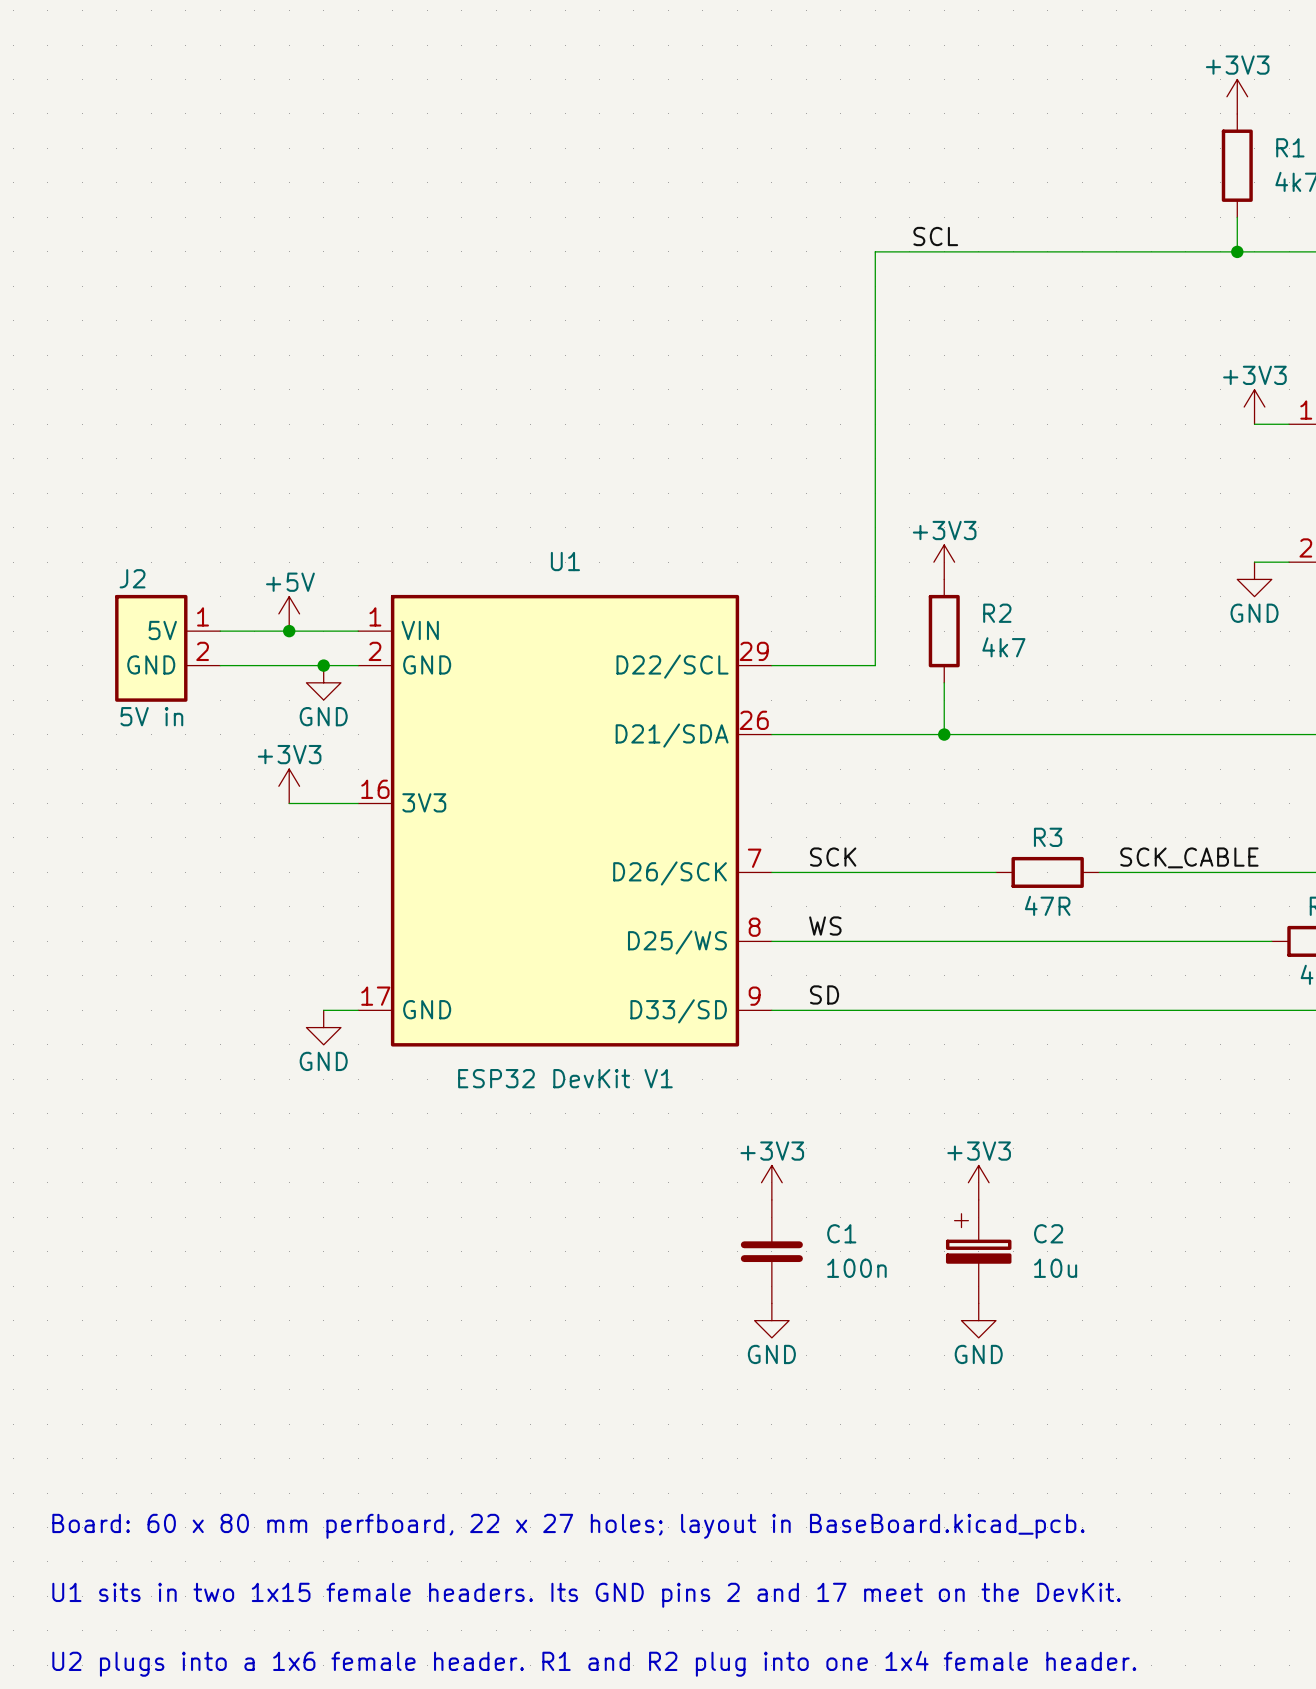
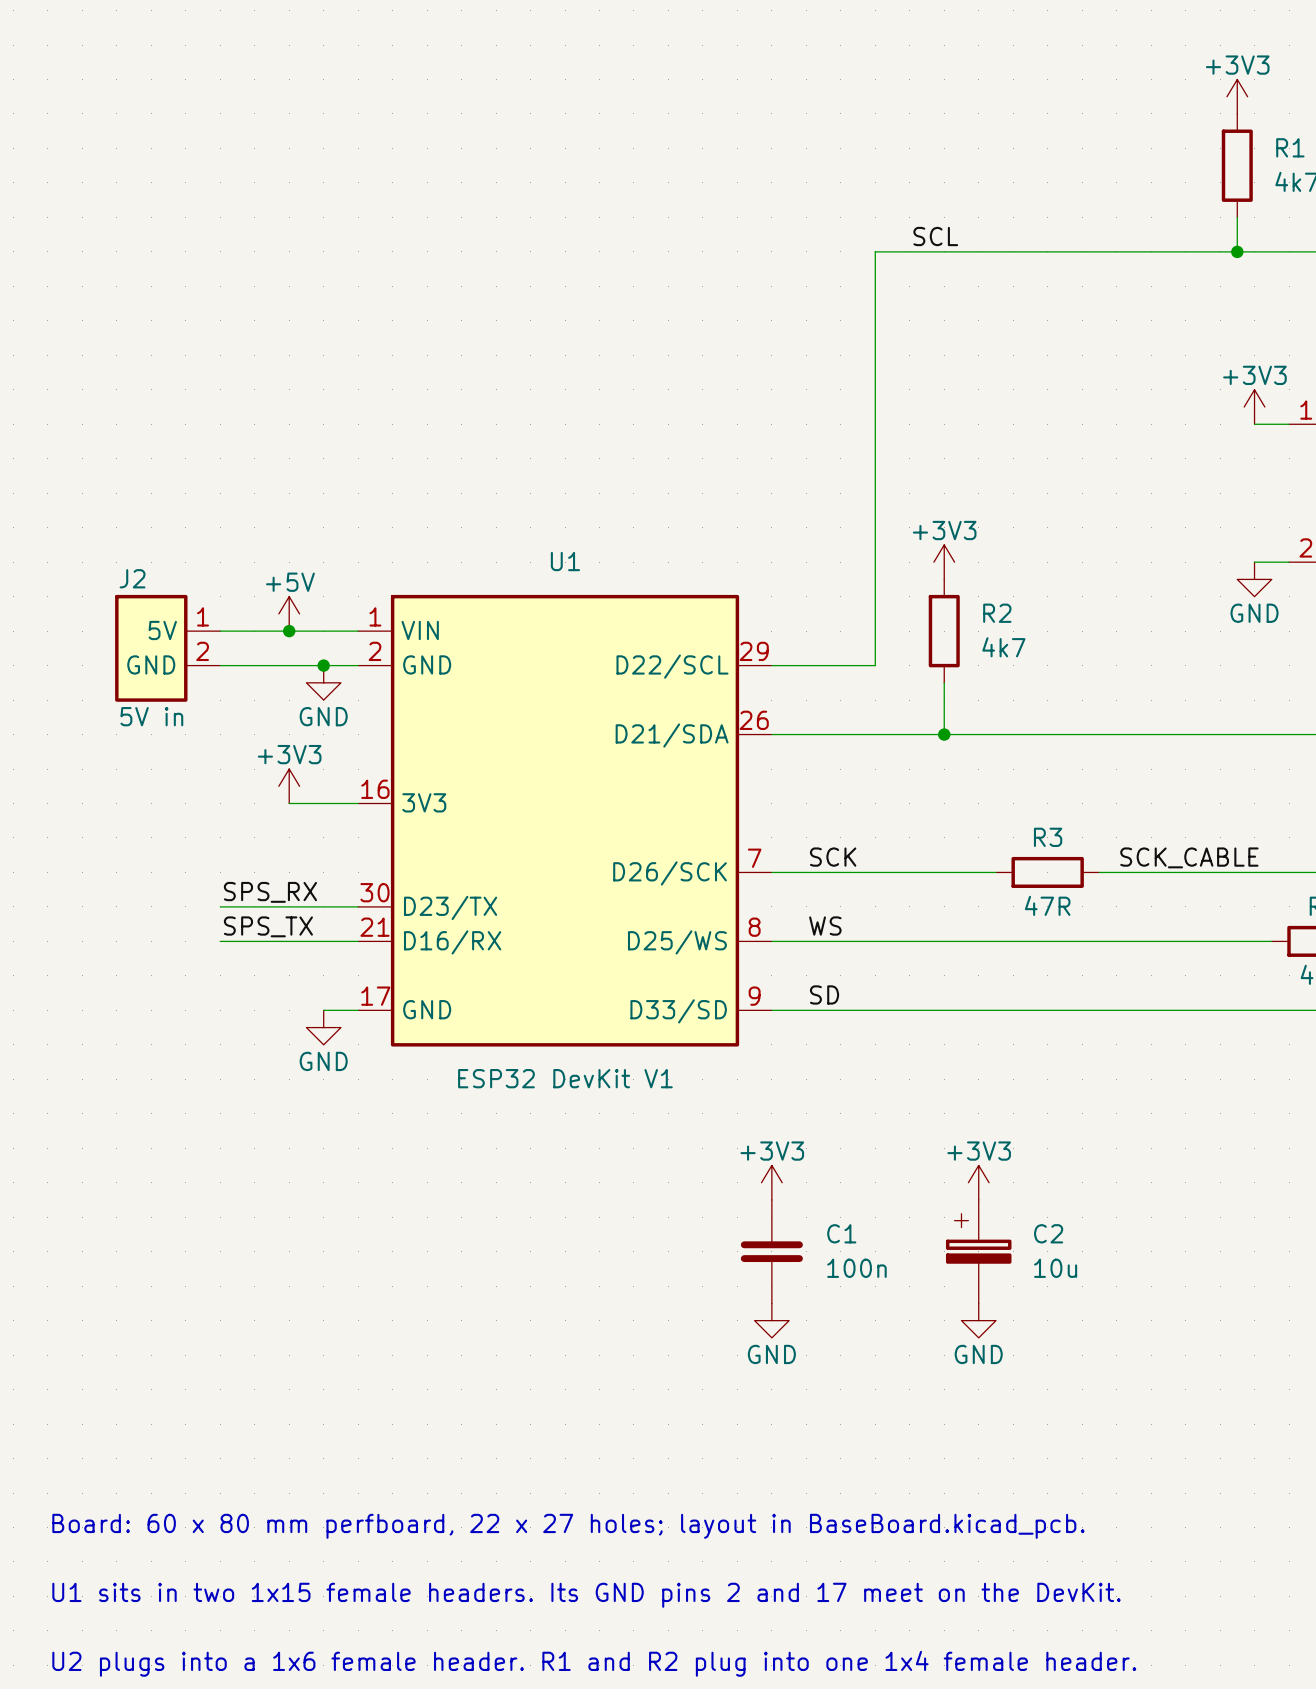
U1 symbol: [358, 594, 772, 1047] -> [358, 594, 772, 1047]
label: none -> SPS_RX (270, 892)
wire: none -> (220, 906) (358, 906)
label: none -> SPS_TX (268, 926)
wire: none -> (220, 941) (358, 941)

